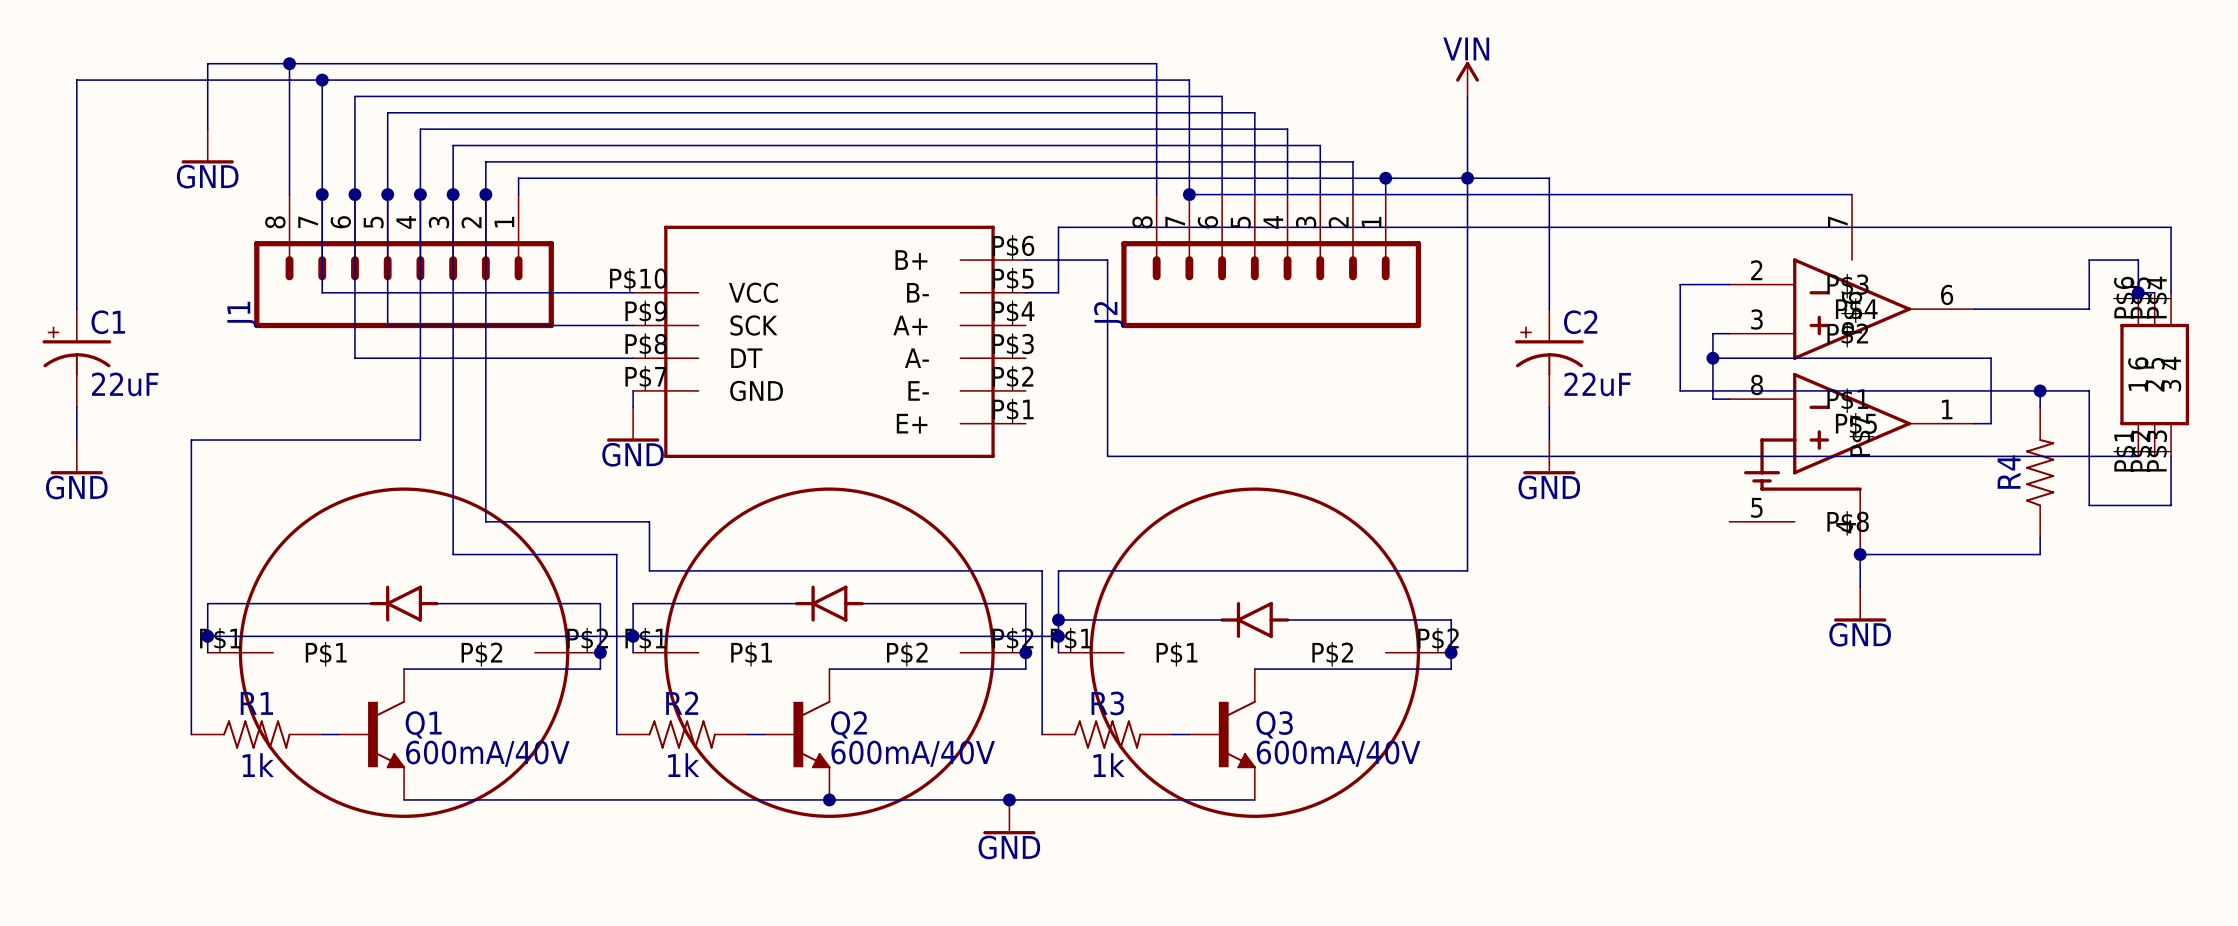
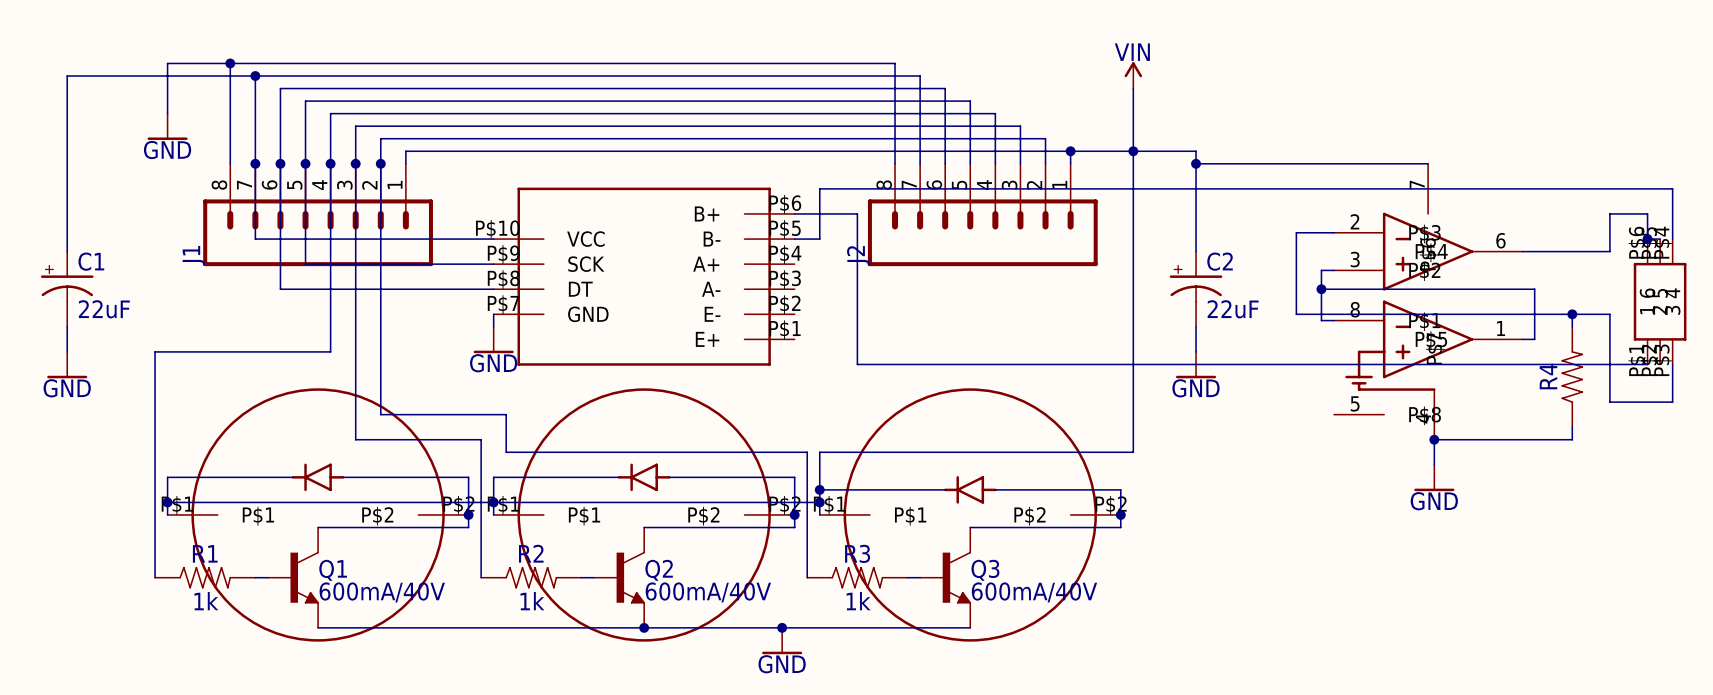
wire: (1189, 194) (1549, 194) -> none
junction: (1189, 194) -> none
junction: none -> (1196, 163)

